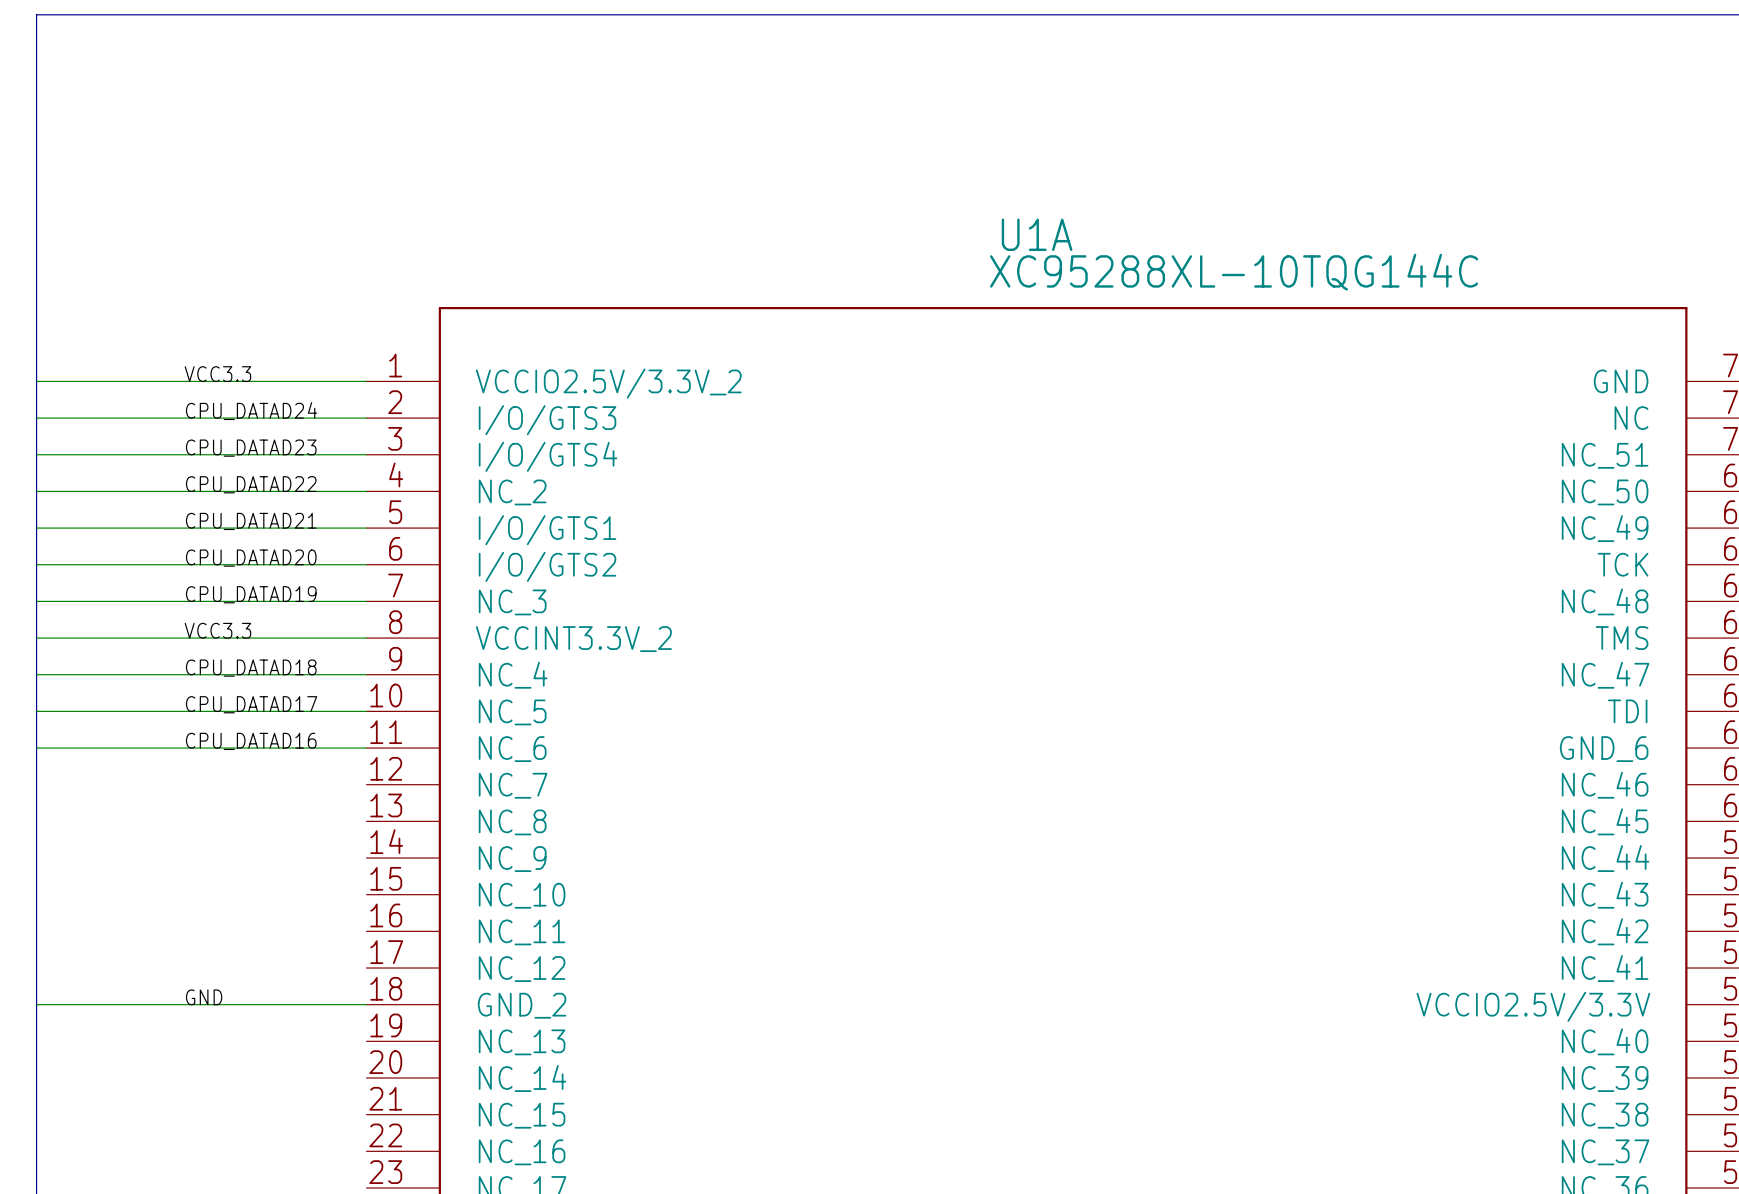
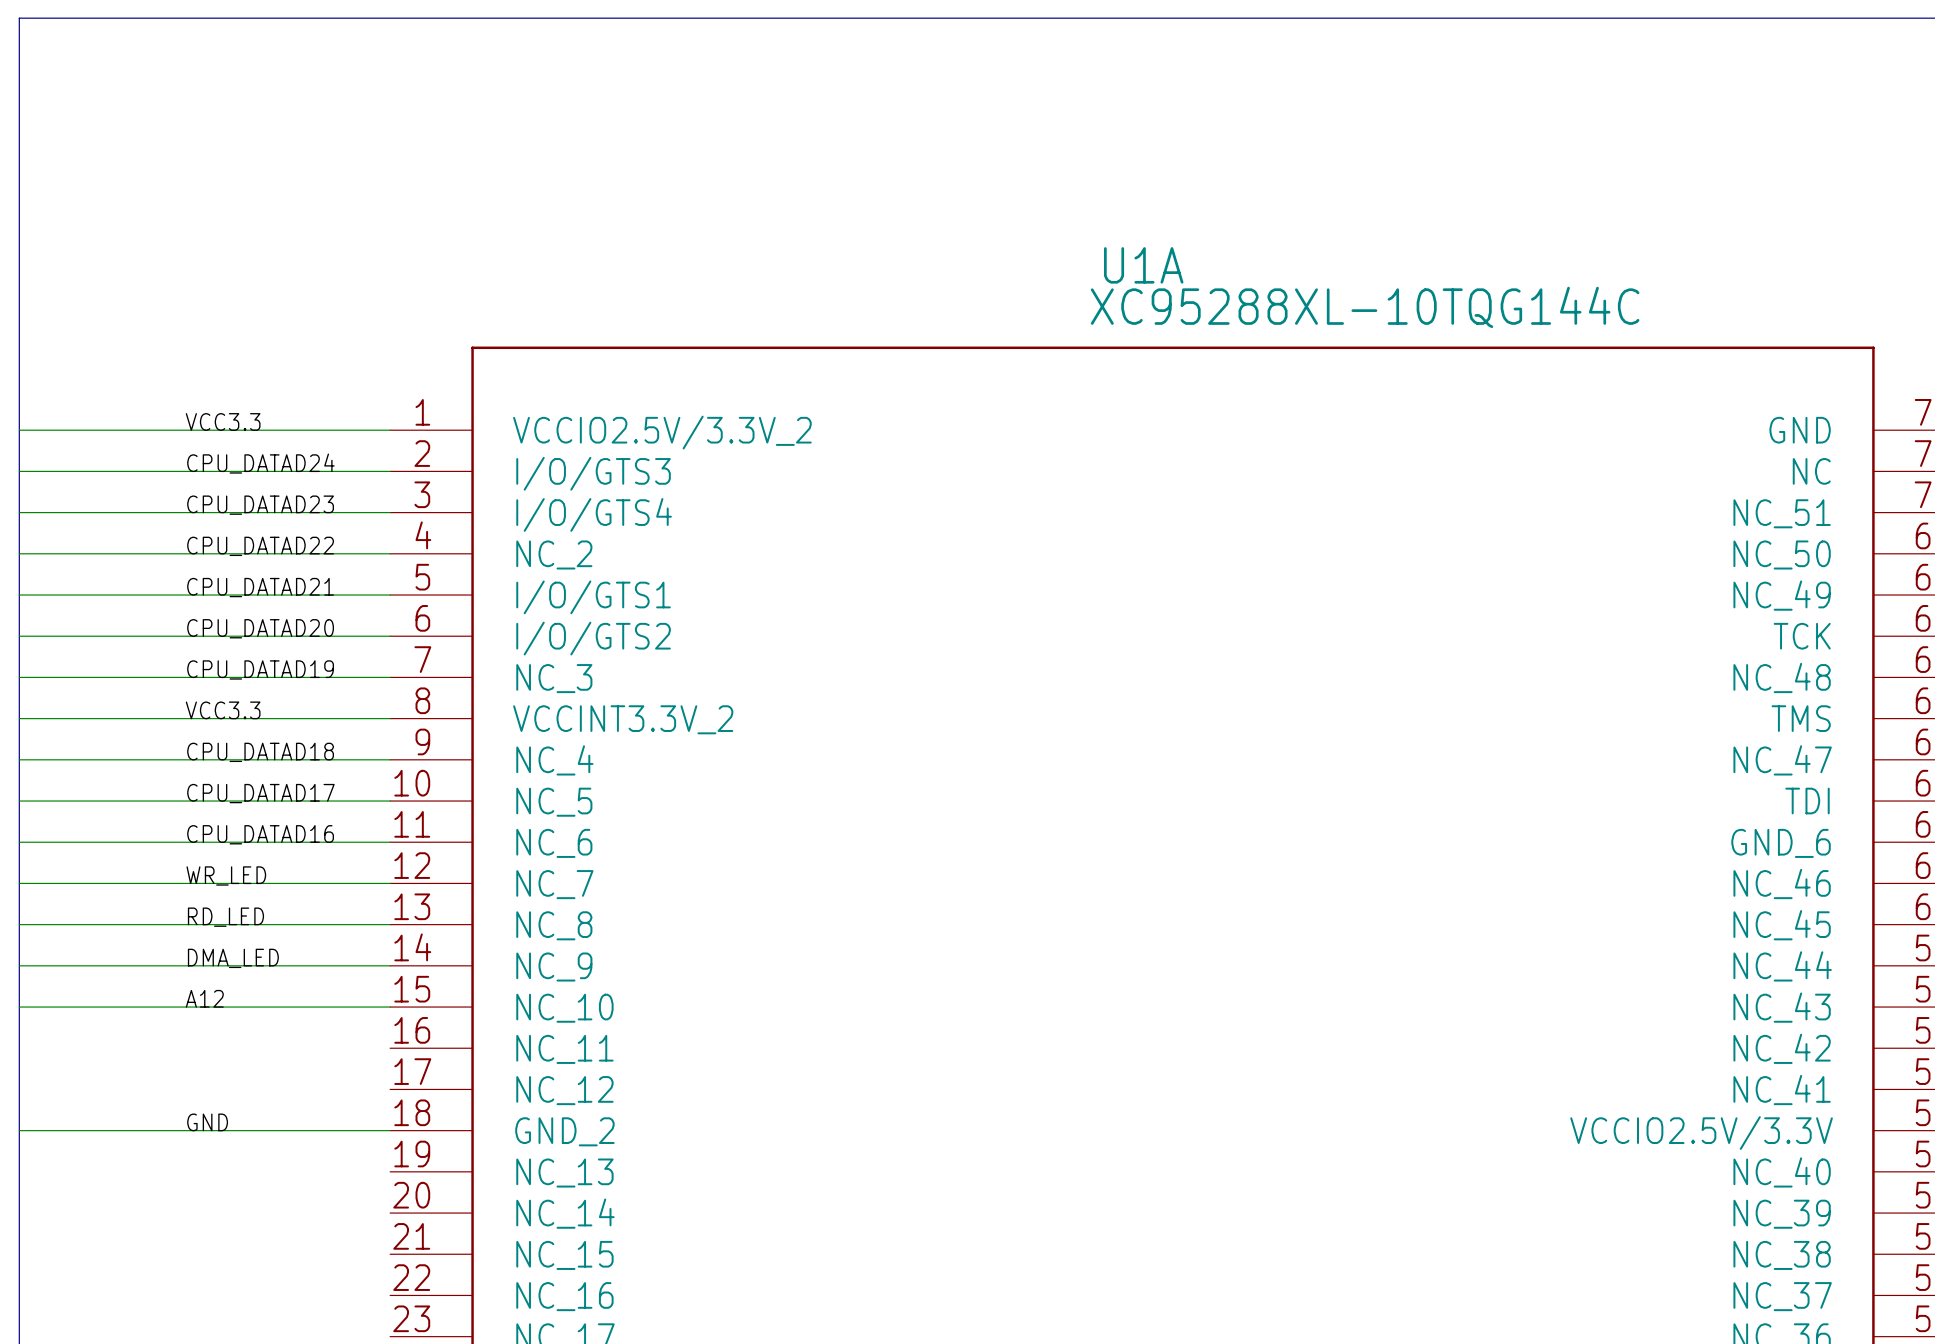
label: none -> WR_LED (226, 875)
wire: none -> (19, 883) (390, 883)
label: none -> RD_LED (225, 917)
wire: none -> (19, 924) (390, 924)
label: none -> DMA_LED (233, 958)
wire: none -> (19, 965) (390, 965)
label: none -> A12 (204, 998)
wire: none -> (19, 1007) (390, 1007)

